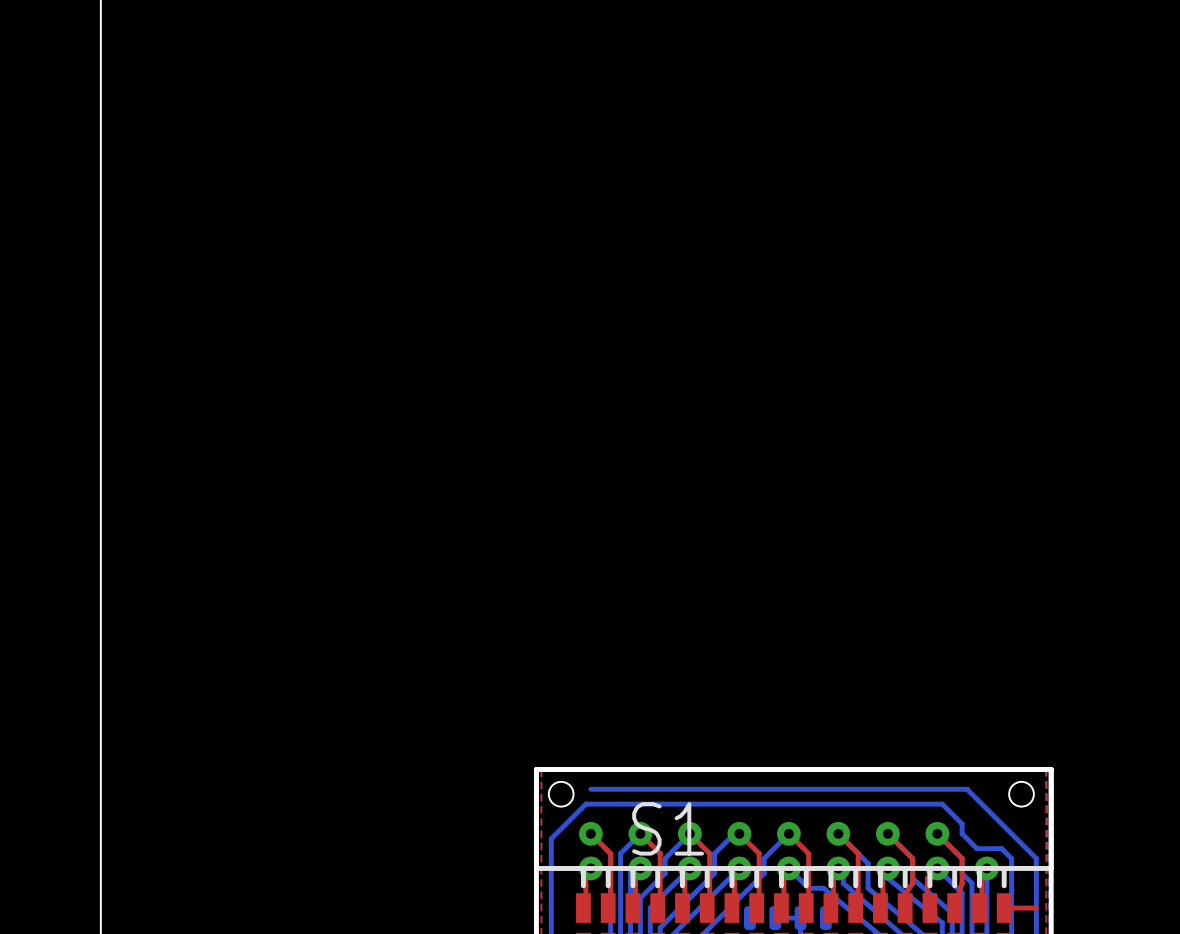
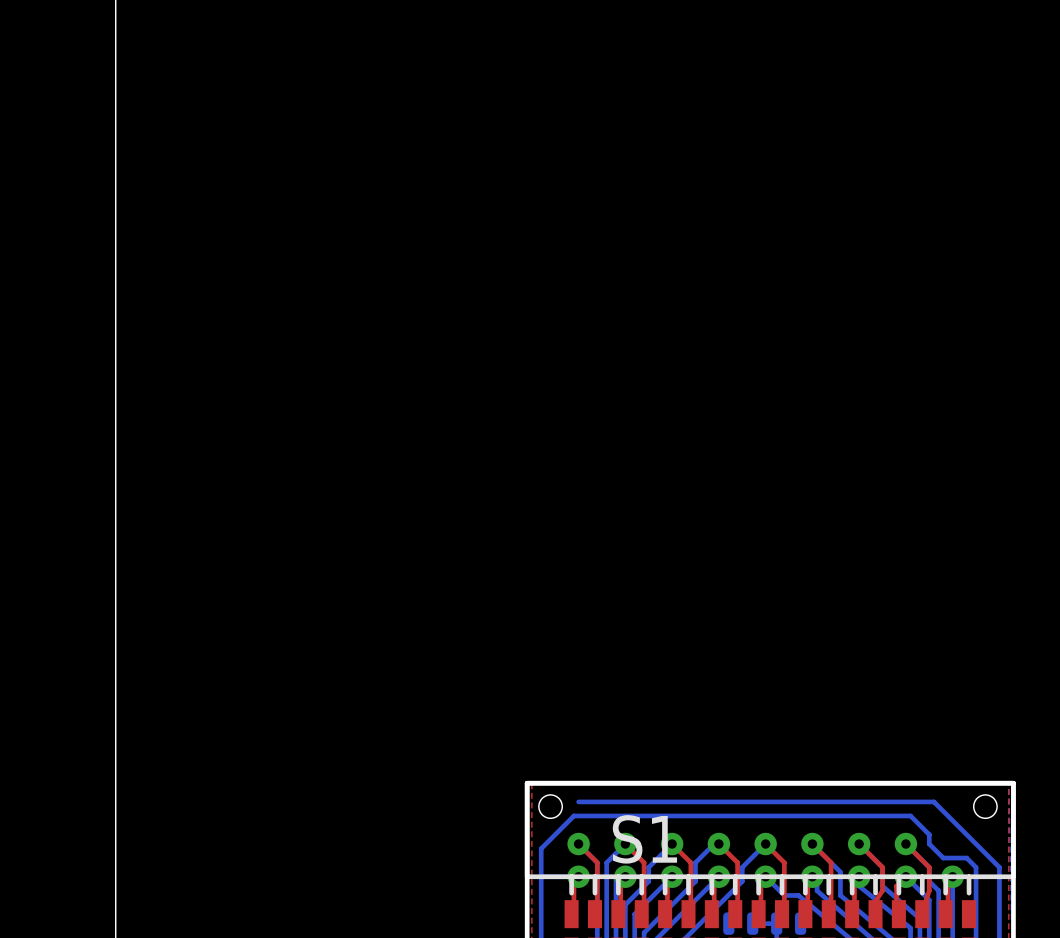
top track: (1004, 908) (1004, 900) (1006, 898) (1006, 903) (1001, 908) (1036, 908) -> none

